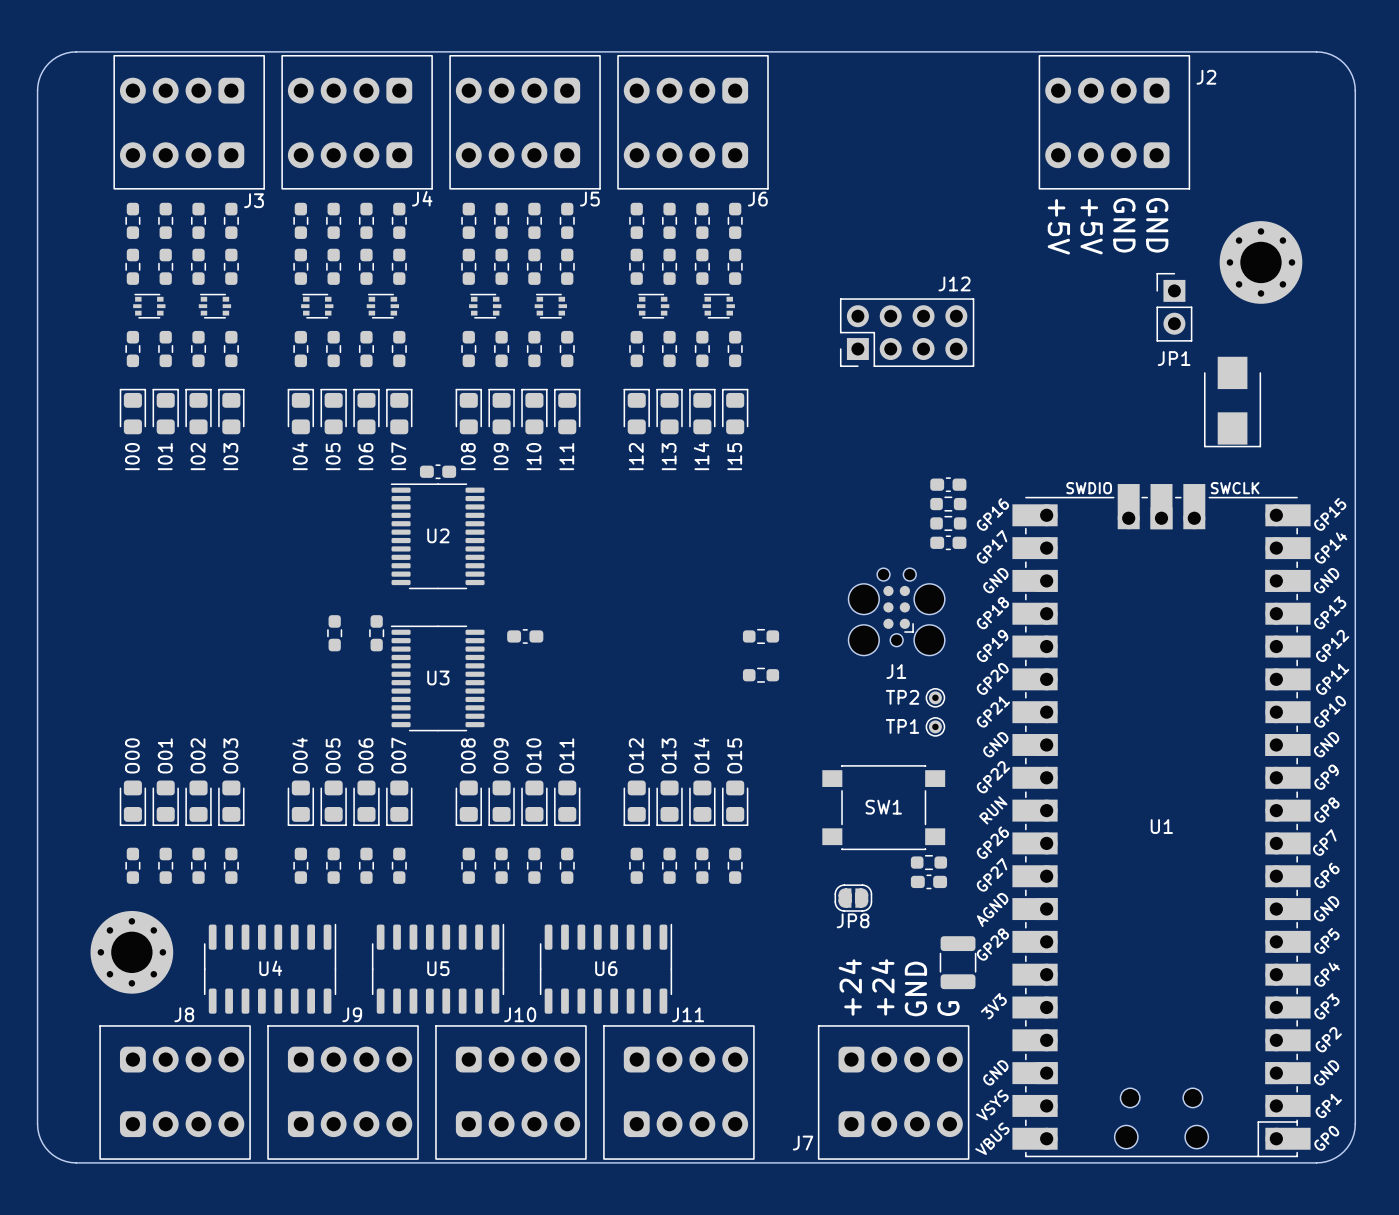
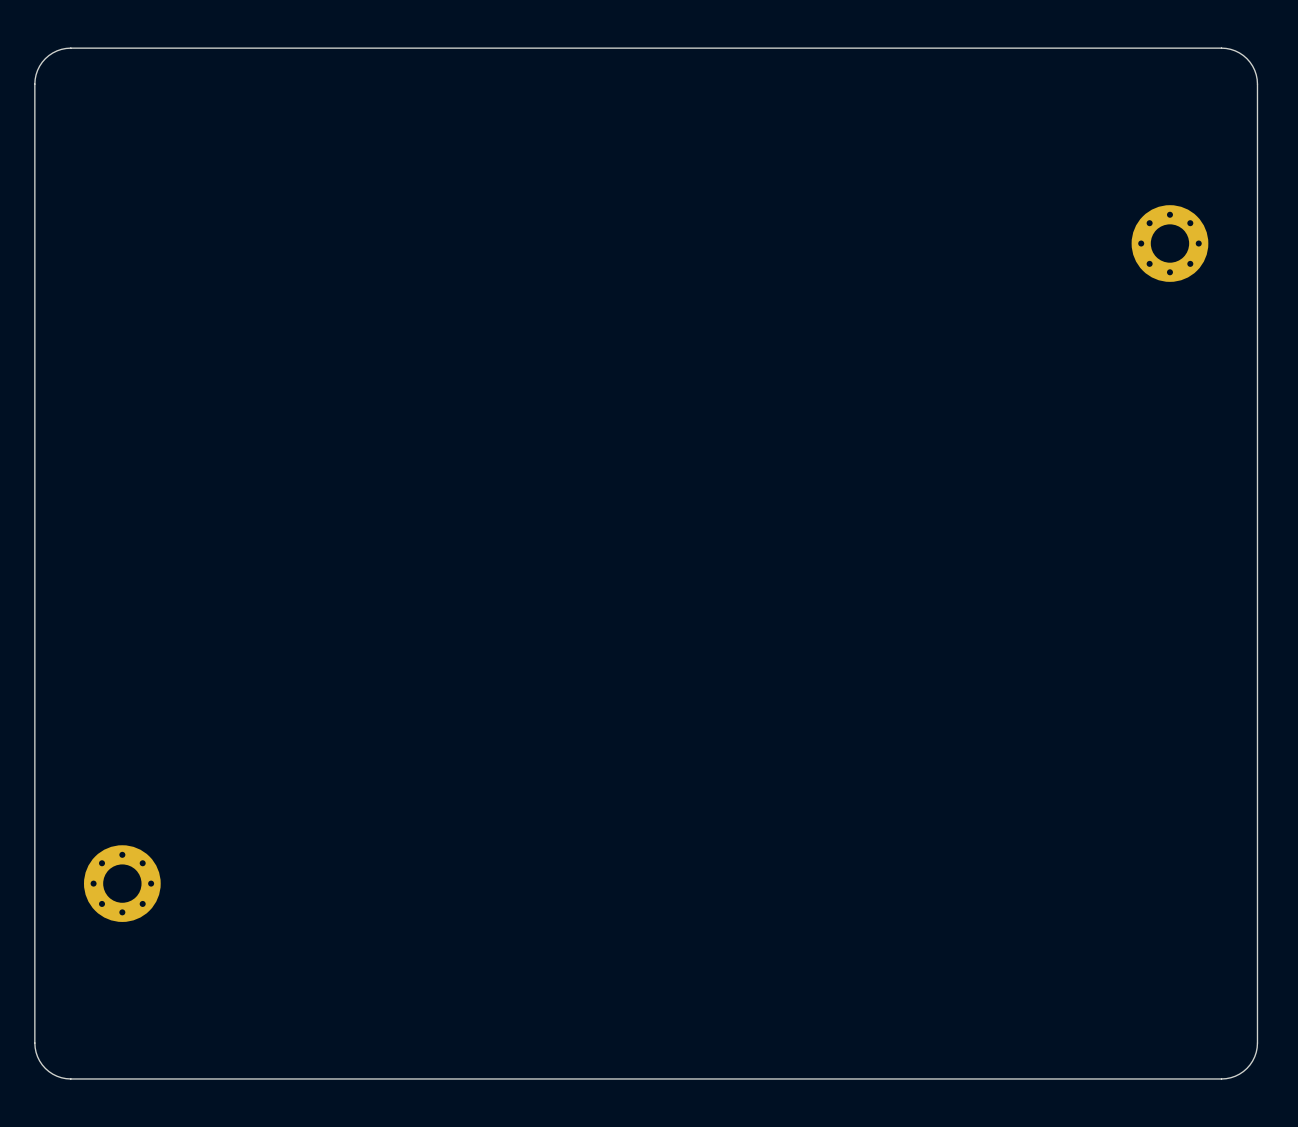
J3: (189, 122) -> none
J4: (357, 122) -> none
J5: (525, 122) -> none
J6: (693, 122) -> none
J2: (1114, 122) -> none
part: (132, 220) -> none
part: (165, 220) -> none
part: (198, 220) -> none
part: (231, 220) -> none
part: (300, 220) -> none
part: (333, 220) -> none
part: (366, 220) -> none
part: (399, 220) -> none
part: (468, 220) -> none
part: (501, 220) -> none
part: (534, 220) -> none
part: (567, 220) -> none
part: (636, 220) -> none
part: (669, 220) -> none
part: (702, 220) -> none
part: (735, 220) -> none
text: GND (1124, 225) -> none
text: GND (1157, 225) -> none
text: +5V (1058, 226) -> none
text: +5V (1091, 226) -> none
part: (132, 266) -> none
part: (165, 266) -> none
part: (198, 266) -> none
part: (231, 266) -> none
part: (300, 266) -> none
part: (333, 266) -> none
part: (366, 266) -> none
part: (399, 266) -> none
part: (468, 266) -> none
part: (501, 266) -> none
part: (534, 266) -> none
part: (567, 266) -> none
part: (636, 266) -> none
part: (669, 266) -> none
part: (702, 266) -> none
part: (735, 266) -> none
part: (149, 306) -> none
part: (214, 306) -> none
part: (317, 306) -> none
part: (382, 306) -> none
part: (485, 306) -> none
part: (550, 306) -> none
part: (653, 306) -> none
part: (718, 306) -> none
JP1: (1174, 307) -> none
J12: (907, 332) -> none
part: (132, 349) -> none
part: (165, 349) -> none
part: (198, 349) -> none
part: (231, 349) -> none
part: (300, 349) -> none
part: (333, 349) -> none
part: (366, 349) -> none
part: (399, 349) -> none
part: (468, 349) -> none
part: (501, 349) -> none
part: (534, 349) -> none
part: (567, 349) -> none
part: (636, 349) -> none
part: (669, 349) -> none
part: (702, 349) -> none
part: (735, 349) -> none
part: (1232, 402) -> none
part: (132, 411) -> none
part: (165, 411) -> none
part: (198, 411) -> none
part: (231, 411) -> none
part: (300, 411) -> none
part: (333, 411) -> none
part: (366, 411) -> none
part: (399, 411) -> none
part: (468, 411) -> none
part: (501, 411) -> none
part: (534, 411) -> none
part: (567, 411) -> none
part: (636, 411) -> none
part: (669, 411) -> none
part: (702, 411) -> none
part: (735, 411) -> none
text: I00 (132, 456) -> none
text: I01 (165, 456) -> none
text: I02 (198, 456) -> none
text: I03 (230, 456) -> none
text: I04 (300, 456) -> none
text: I05 (333, 456) -> none
text: I06 (365, 456) -> none
text: I07 (398, 456) -> none
text: I08 (468, 456) -> none
text: I09 (501, 456) -> none
text: I10 (533, 456) -> none
text: I11 (566, 456) -> none
text: I12 (636, 456) -> none
text: I13 (669, 456) -> none
text: I14 (701, 456) -> none
text: I15 (734, 456) -> none
part: (438, 471) -> none
part: (948, 484) -> none
part: (948, 504) -> none
part: (948, 523) -> none
U2: (437, 536) -> none
part: (948, 542) -> none
J1: (896, 611) -> none
part: (334, 633) -> none
part: (376, 633) -> none
part: (525, 636) -> none
part: (761, 636) -> none
part: (761, 675) -> none
U3: (437, 678) -> none
TP2: (935, 697) -> none
TP1: (935, 726) -> none
text: O00 (132, 755) -> none
text: O01 (165, 755) -> none
text: O02 (198, 755) -> none
text: O03 (230, 755) -> none
text: O04 (300, 755) -> none
text: O05 (333, 755) -> none
text: O06 (365, 755) -> none
text: O07 (398, 755) -> none
text: O08 (468, 755) -> none
text: O09 (501, 755) -> none
text: O10 (533, 755) -> none
text: O11 (566, 755) -> none
text: O12 (636, 755) -> none
text: O13 (669, 755) -> none
text: O14 (701, 755) -> none
text: O15 (734, 755) -> none
part: (132, 803) -> none
part: (165, 803) -> none
part: (198, 803) -> none
part: (231, 803) -> none
part: (300, 803) -> none
part: (333, 803) -> none
part: (366, 803) -> none
part: (399, 803) -> none
part: (468, 803) -> none
part: (501, 803) -> none
part: (534, 803) -> none
part: (567, 803) -> none
part: (636, 803) -> none
part: (669, 803) -> none
part: (702, 803) -> none
part: (735, 803) -> none
SW1: (883, 807) -> none
U1: (1161, 820) -> none
part: (928, 862) -> none
part: (132, 865) -> none
part: (165, 865) -> none
part: (198, 865) -> none
part: (231, 865) -> none
part: (300, 865) -> none
part: (333, 865) -> none
part: (366, 865) -> none
part: (399, 865) -> none
part: (468, 865) -> none
part: (501, 865) -> none
part: (534, 865) -> none
part: (567, 865) -> none
part: (636, 865) -> none
part: (669, 865) -> none
part: (702, 865) -> none
part: (735, 865) -> none
part: (928, 881) -> none
JP8: (853, 898) -> none
part: (958, 962) -> none
U4: (270, 968) -> none
U5: (438, 968) -> none
U6: (605, 968) -> none
text: +24 (850, 987) -> none
text: +24 (882, 987) -> none
text: GND (915, 988) -> none
text: G (948, 1008) -> none
J8: (175, 1092) -> none
J9: (343, 1092) -> none
J10: (510, 1092) -> none
J11: (678, 1092) -> none
J7: (893, 1092) -> none

